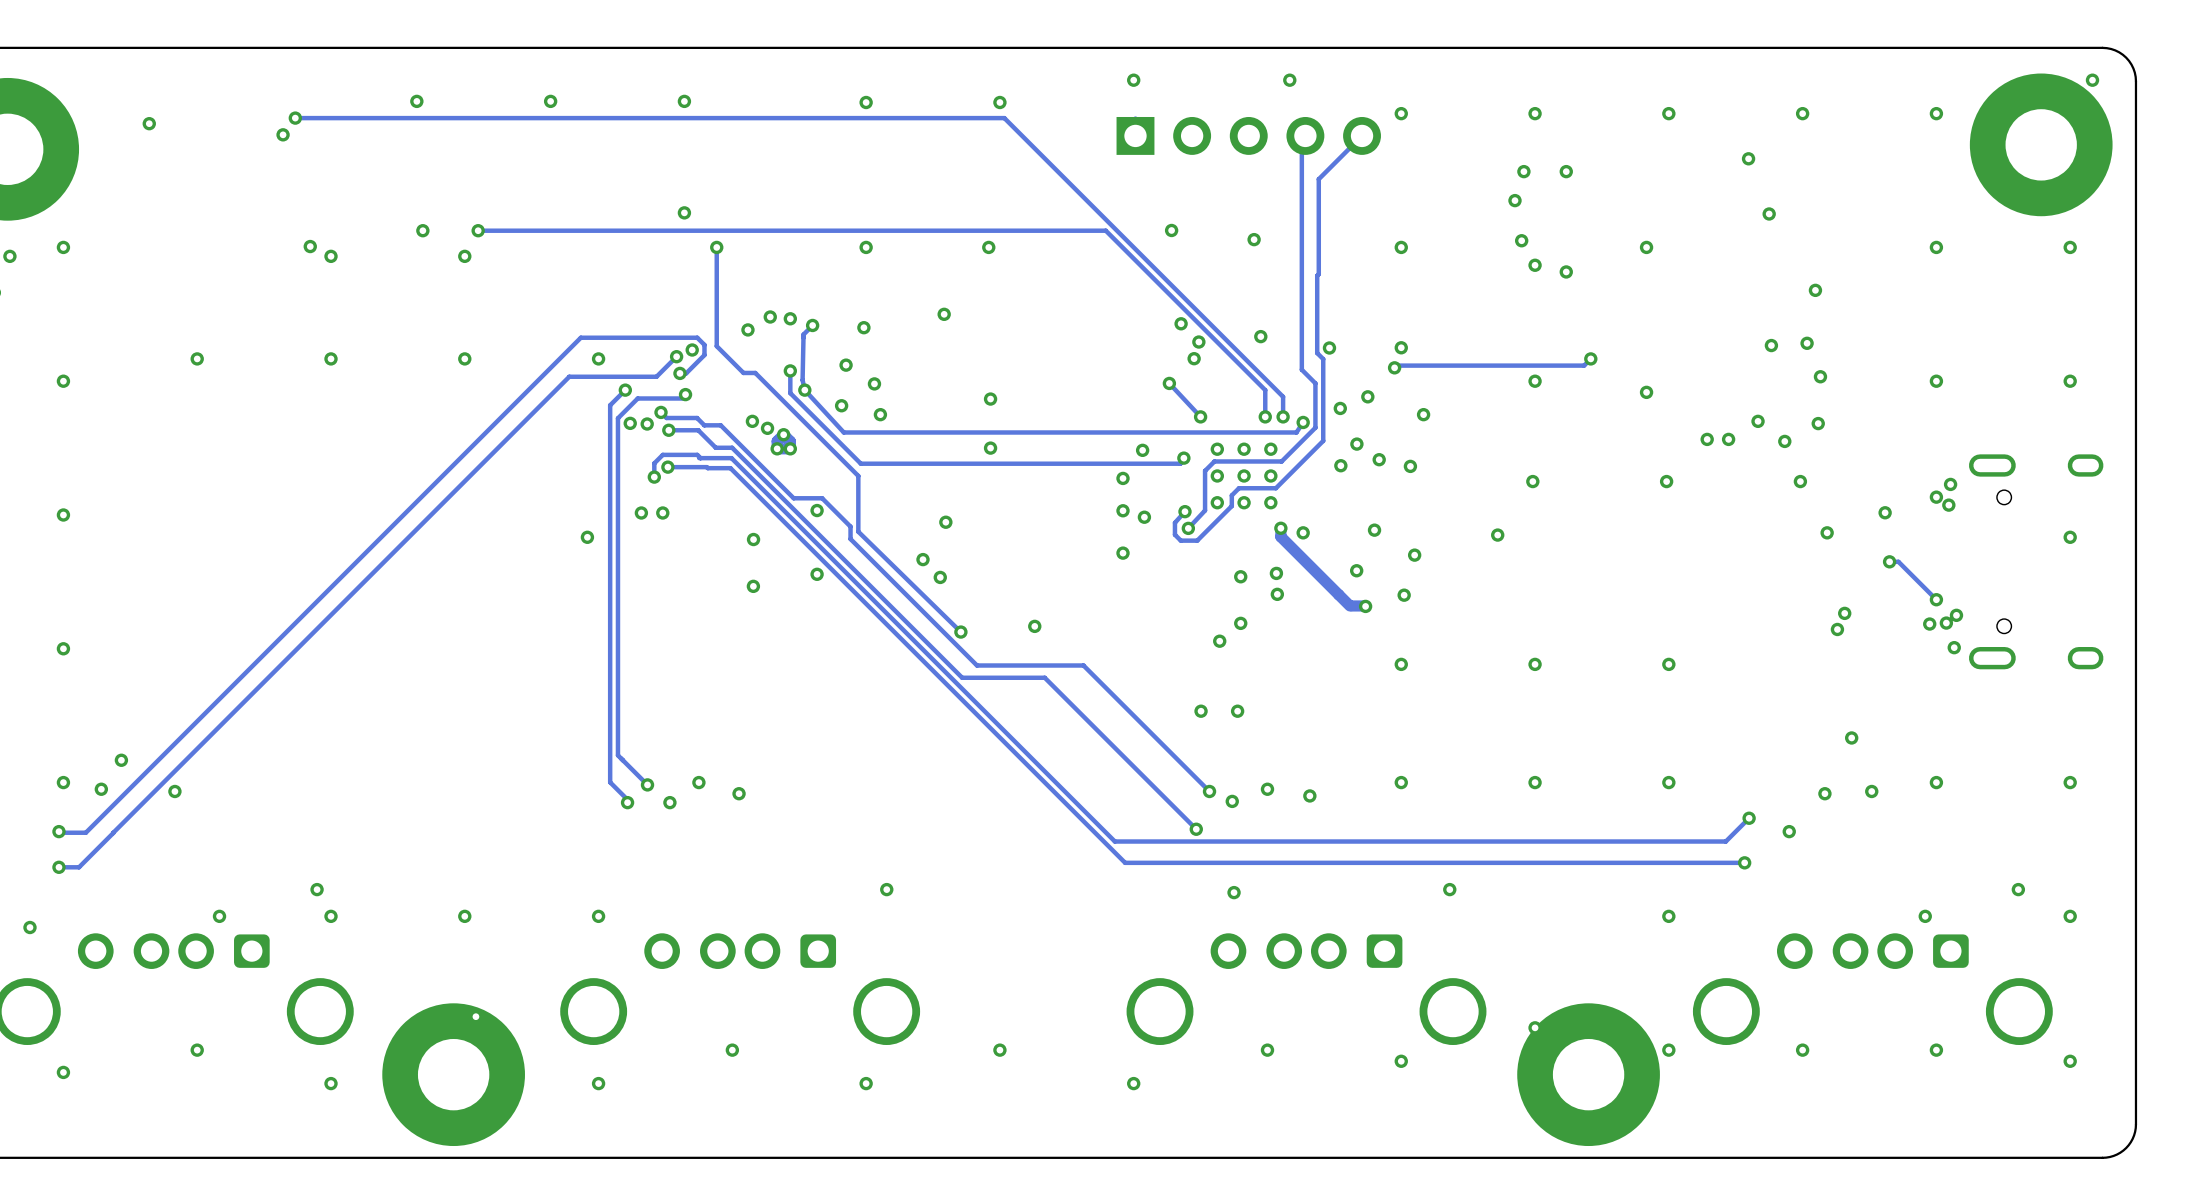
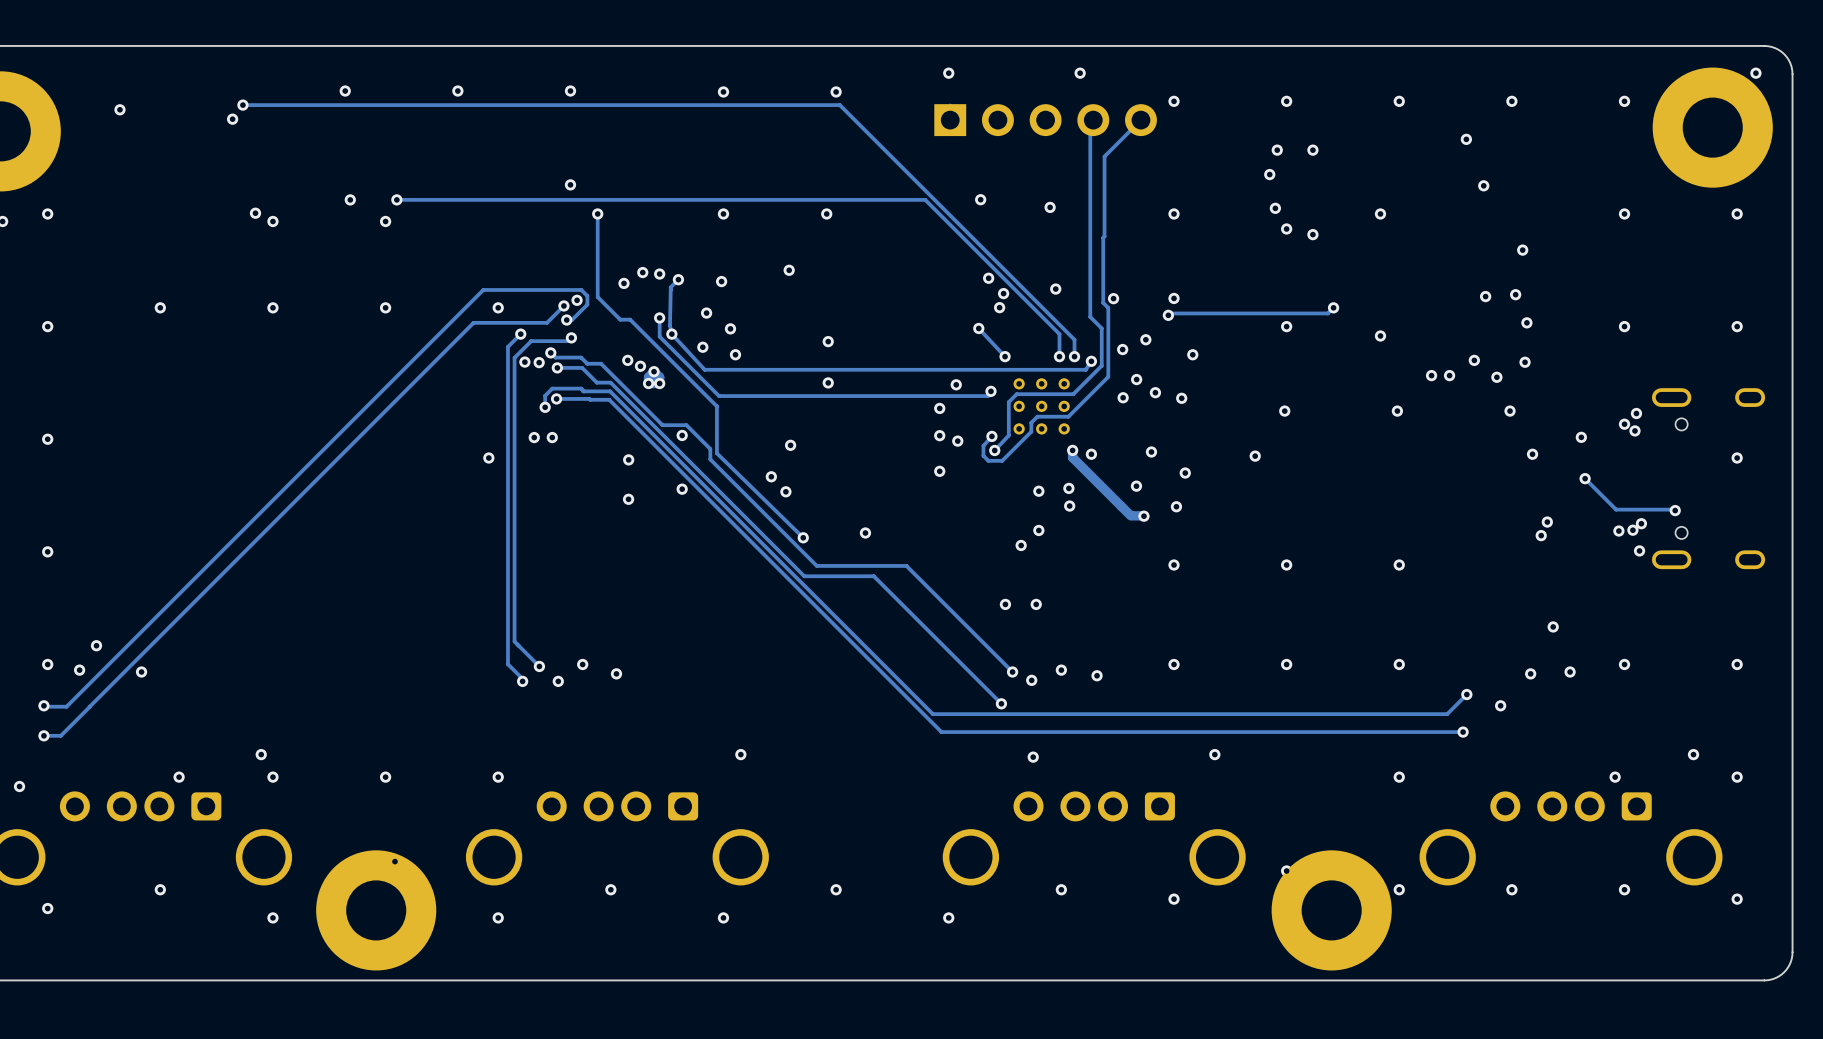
track: (1889, 561) (1898, 561) (1936, 599) -> (1585, 478) (1616, 509) (1675, 510)
via position: (1936, 599) -> (1675, 510)

